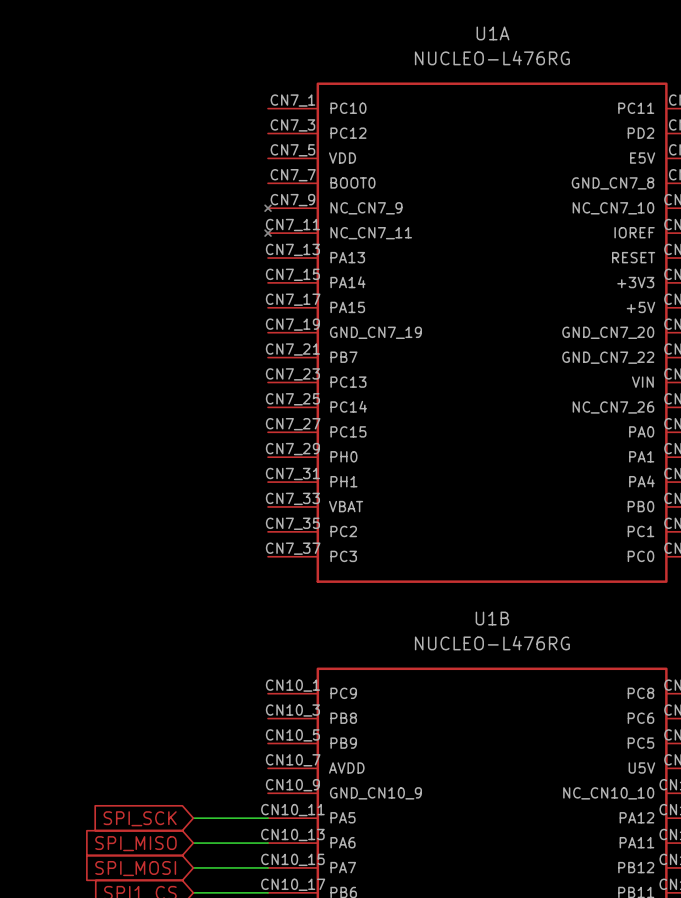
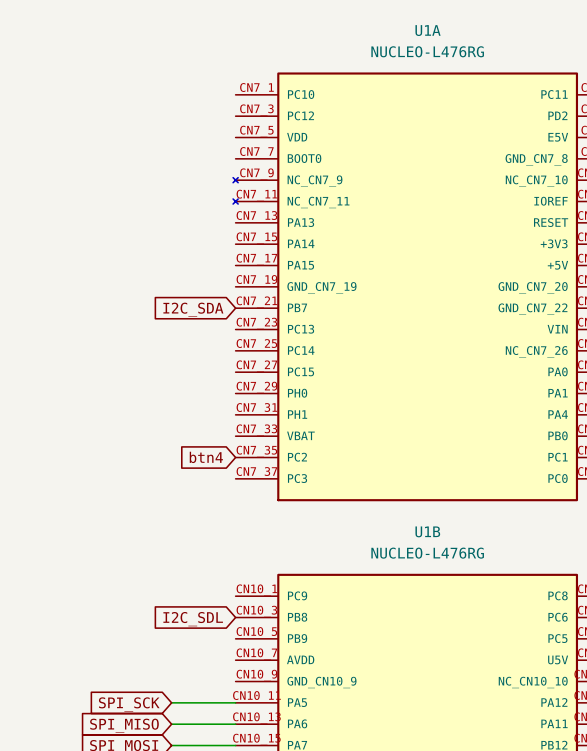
global label: none -> I2C_SDA (193, 309)
global label: none -> btn4 (206, 457)
global label: none -> I2C_SDL (193, 619)

